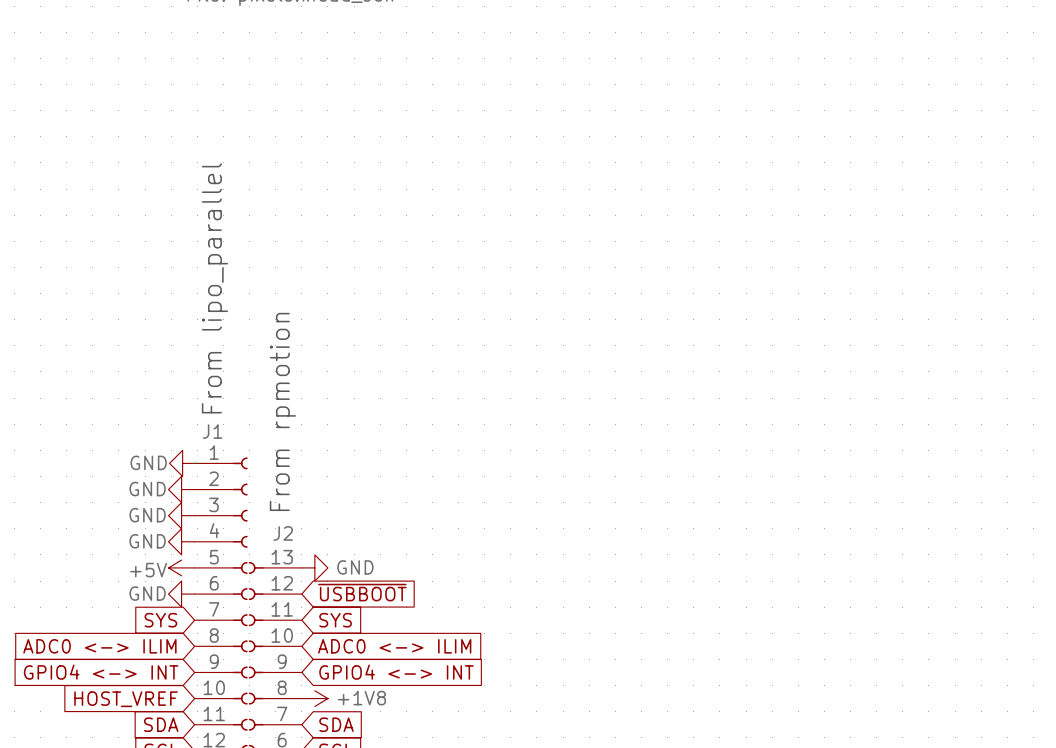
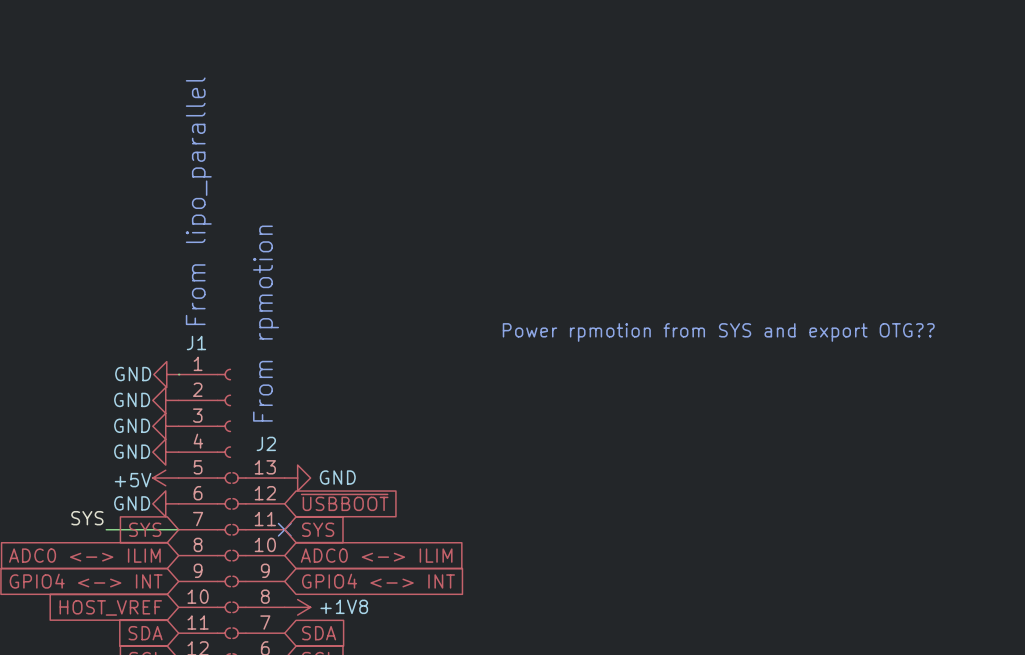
text: none -> Power rpmotion from SYS and export OTG?? (718, 332)
label: none -> SYS (87, 518)
wire: none -> (106, 529) (178, 529)
no-connect mark: none -> (284, 529)

